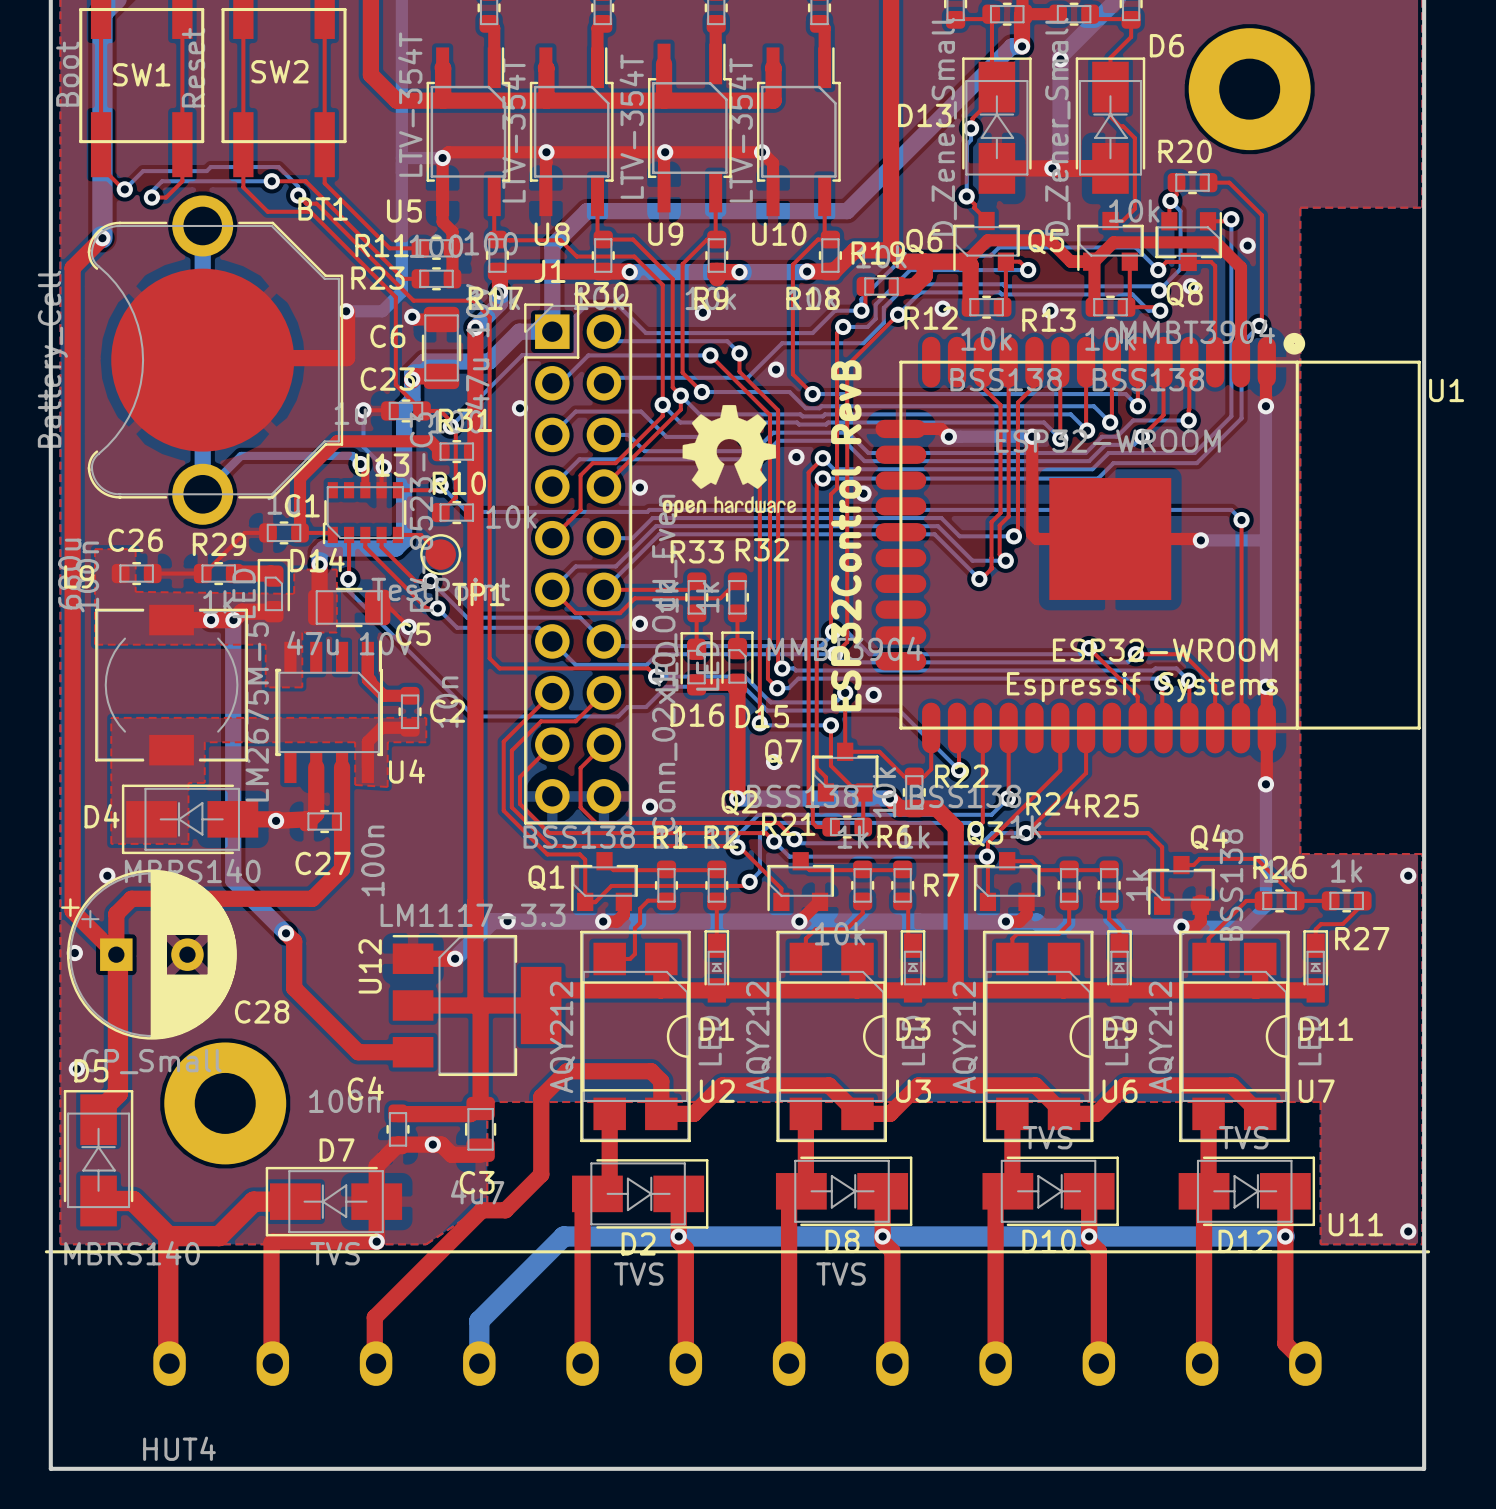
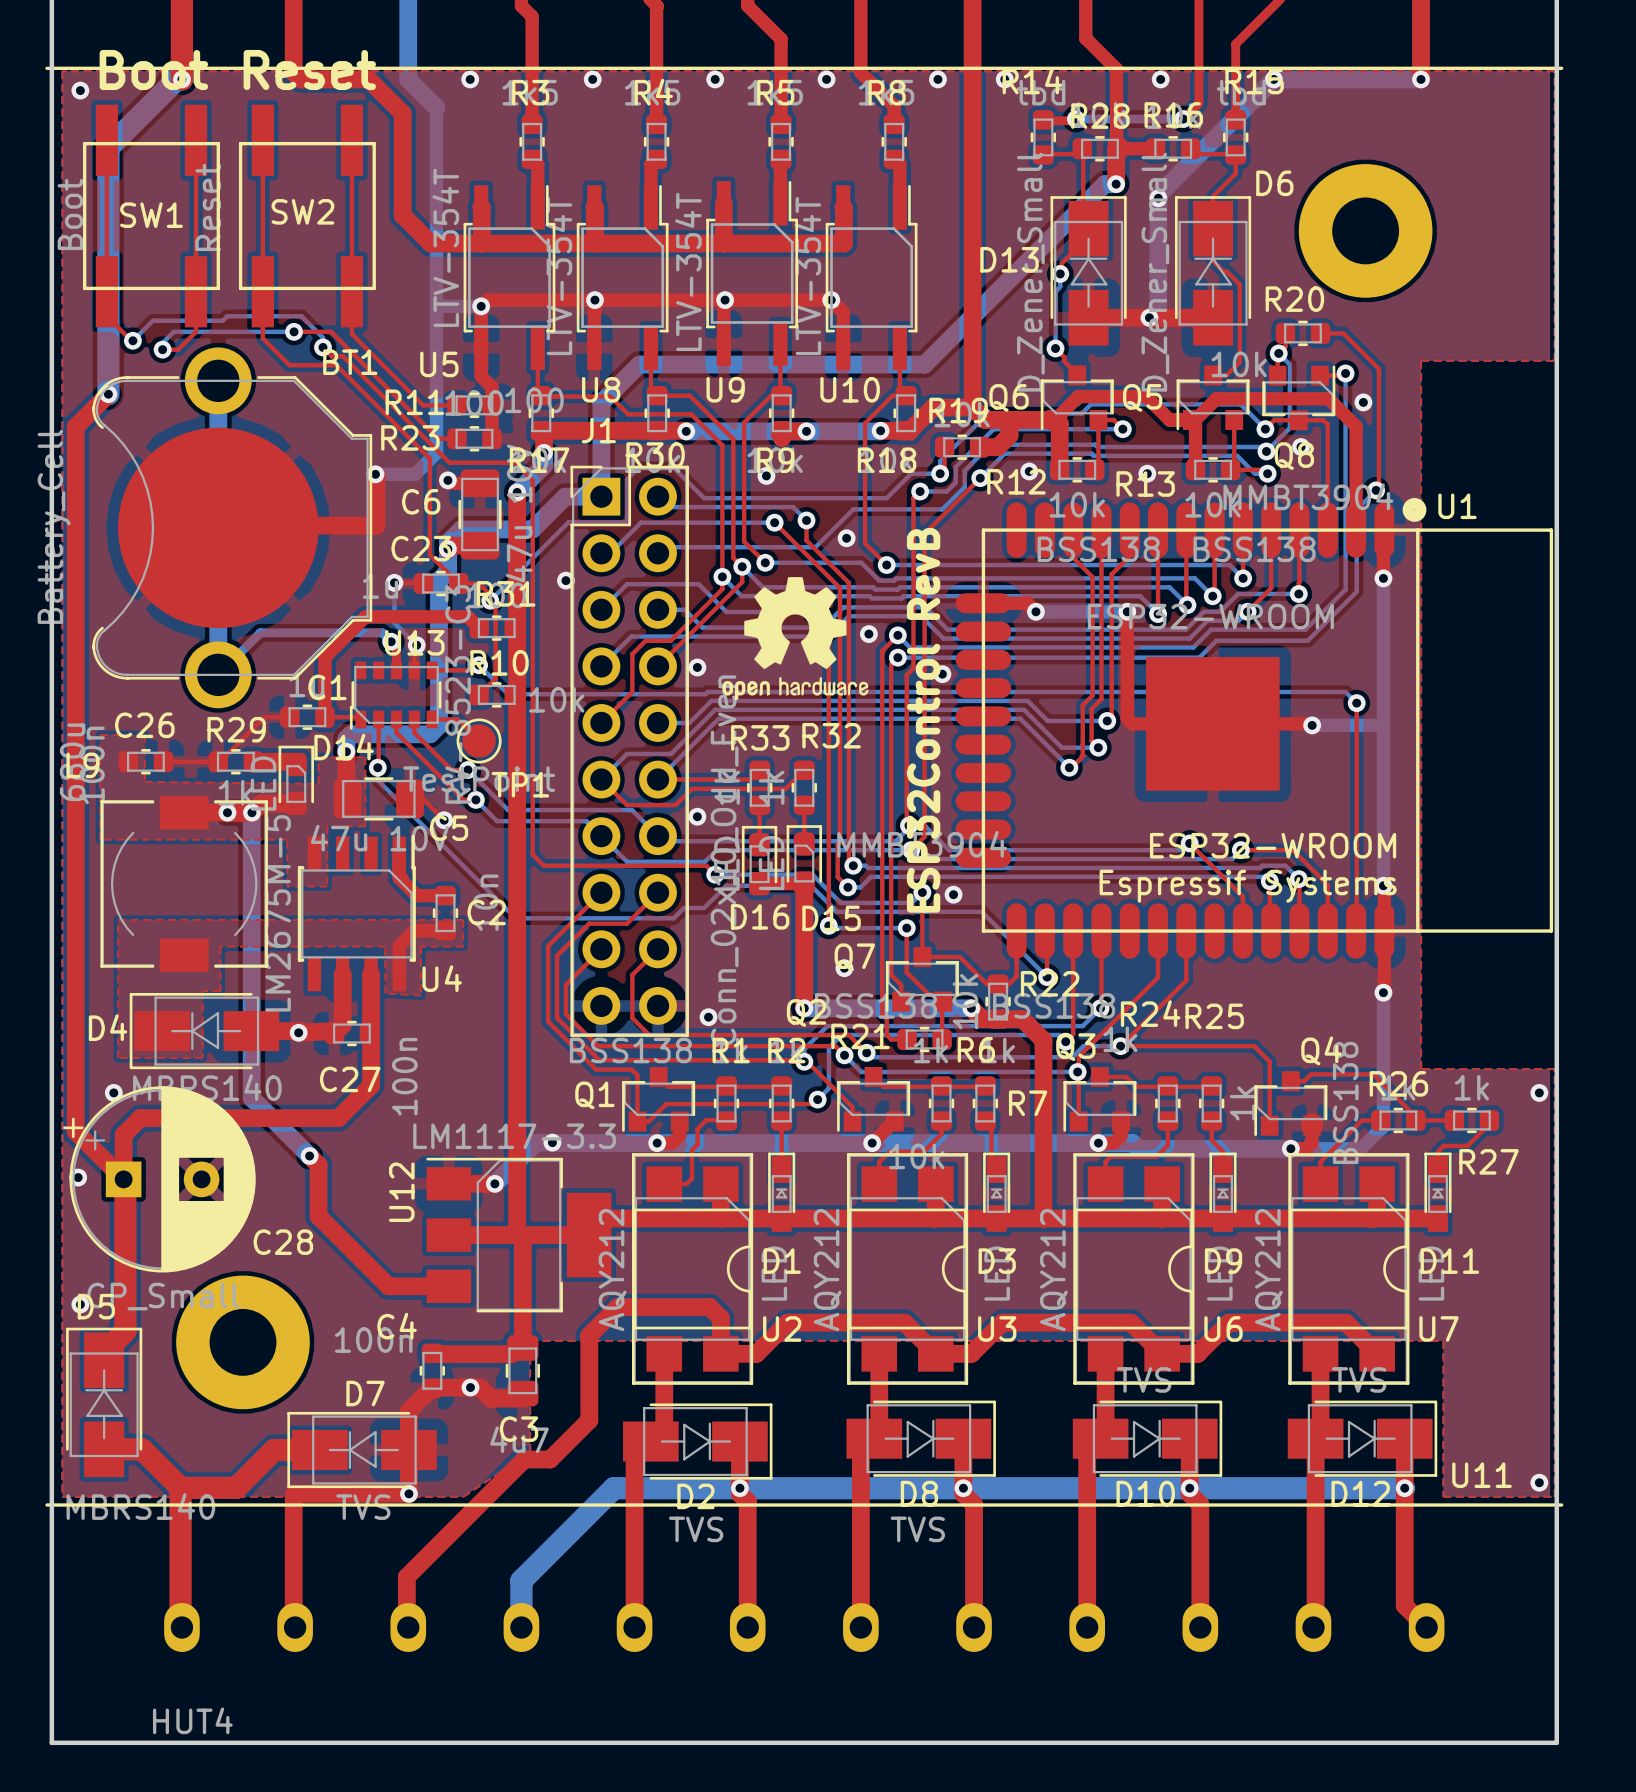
U1 name position: U1 (1446, 390) -> U1 (1457, 506)

